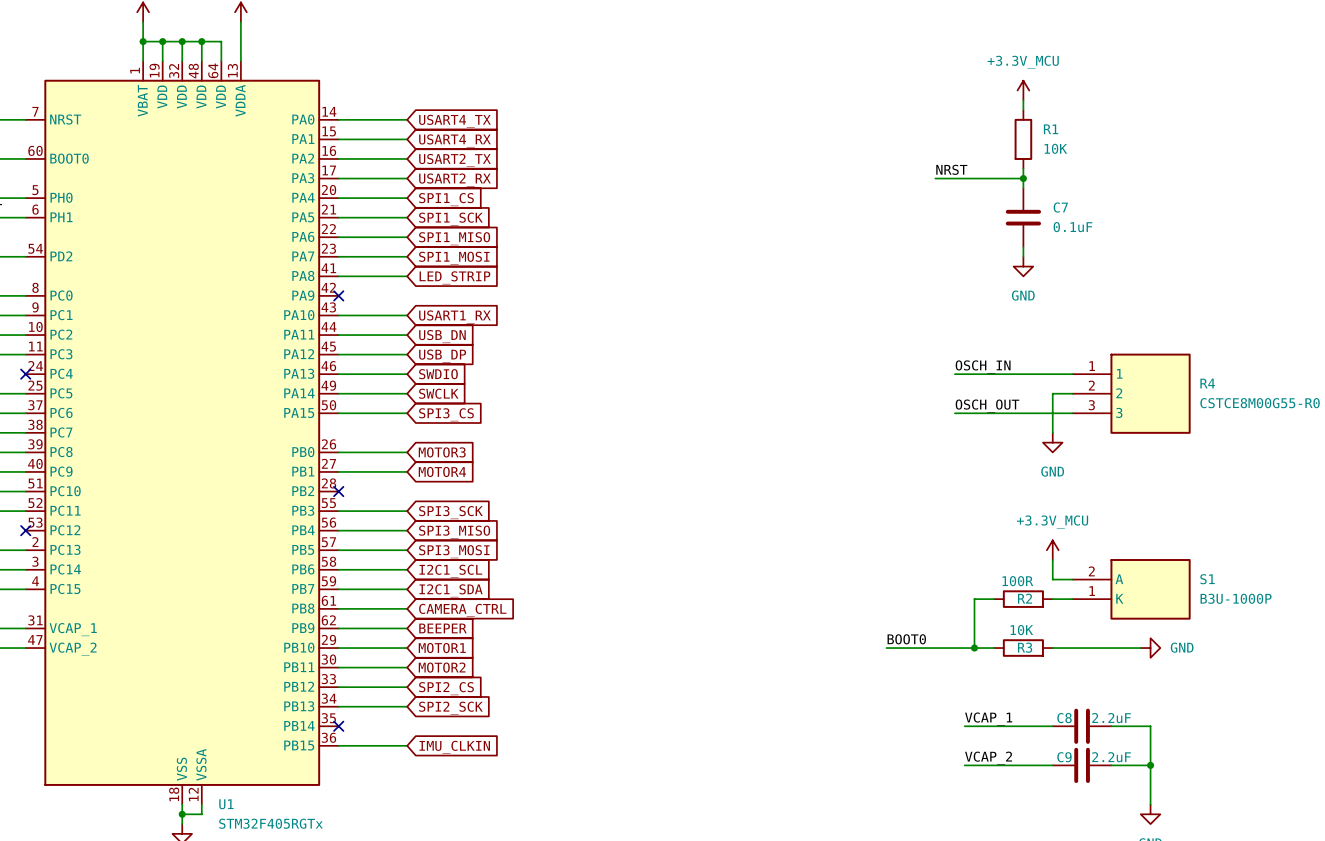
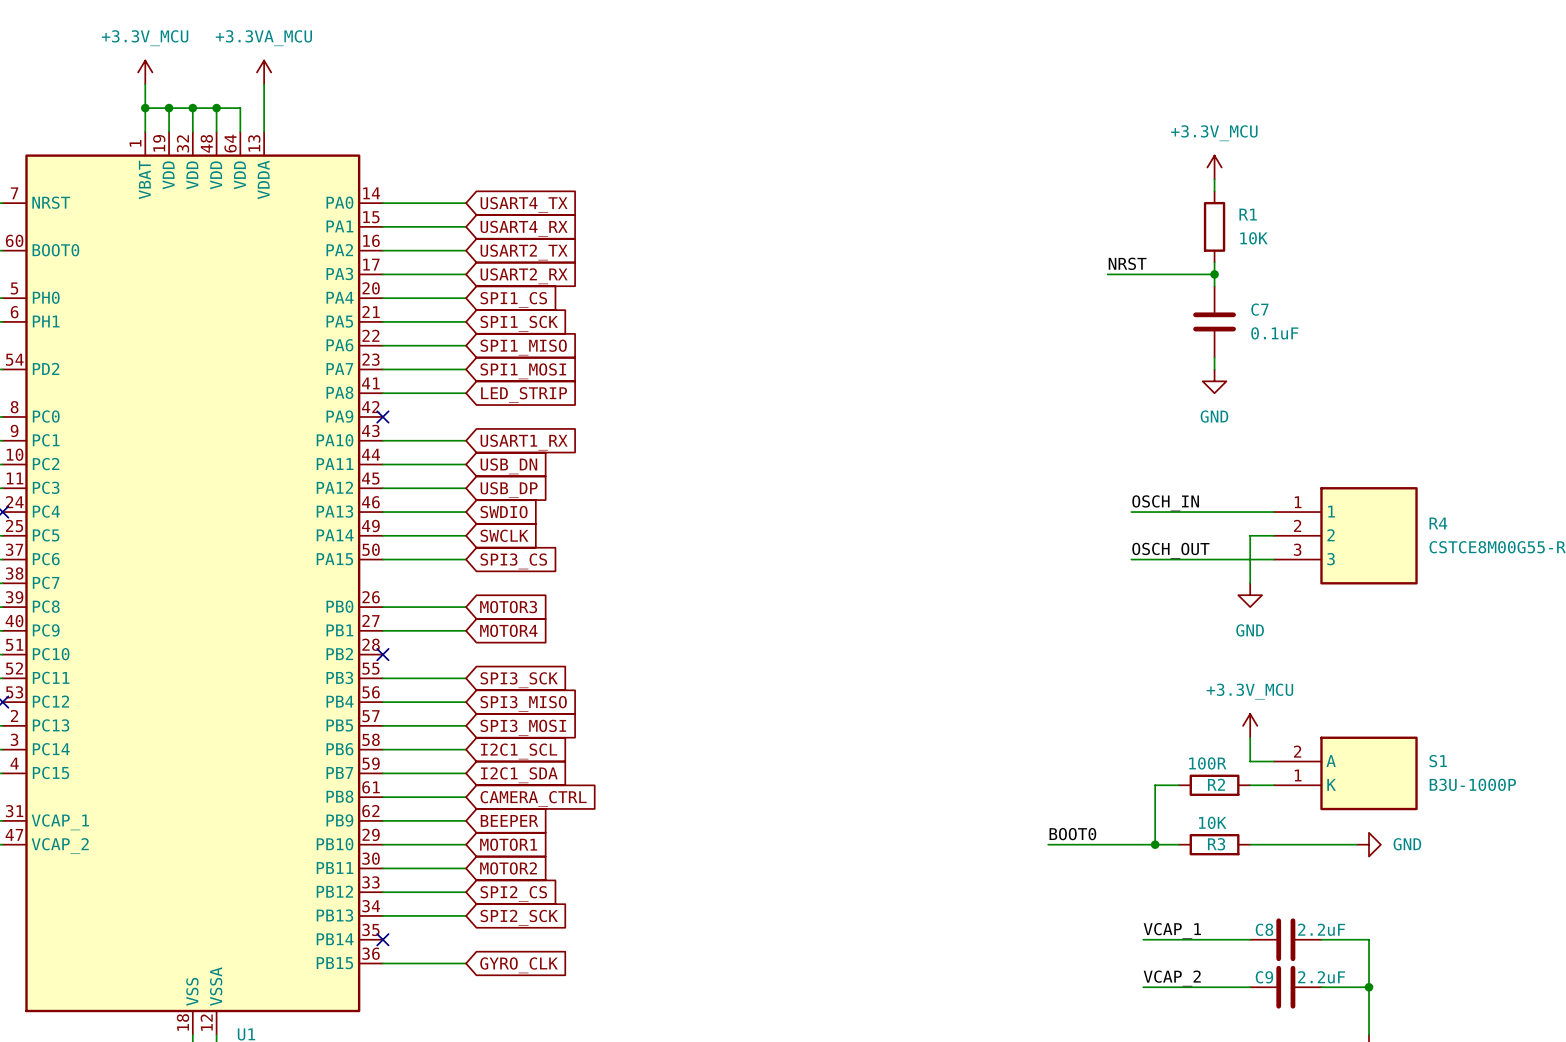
global label: IMU_CLKIN (454, 747) -> GYRO_CLK (519, 965)

